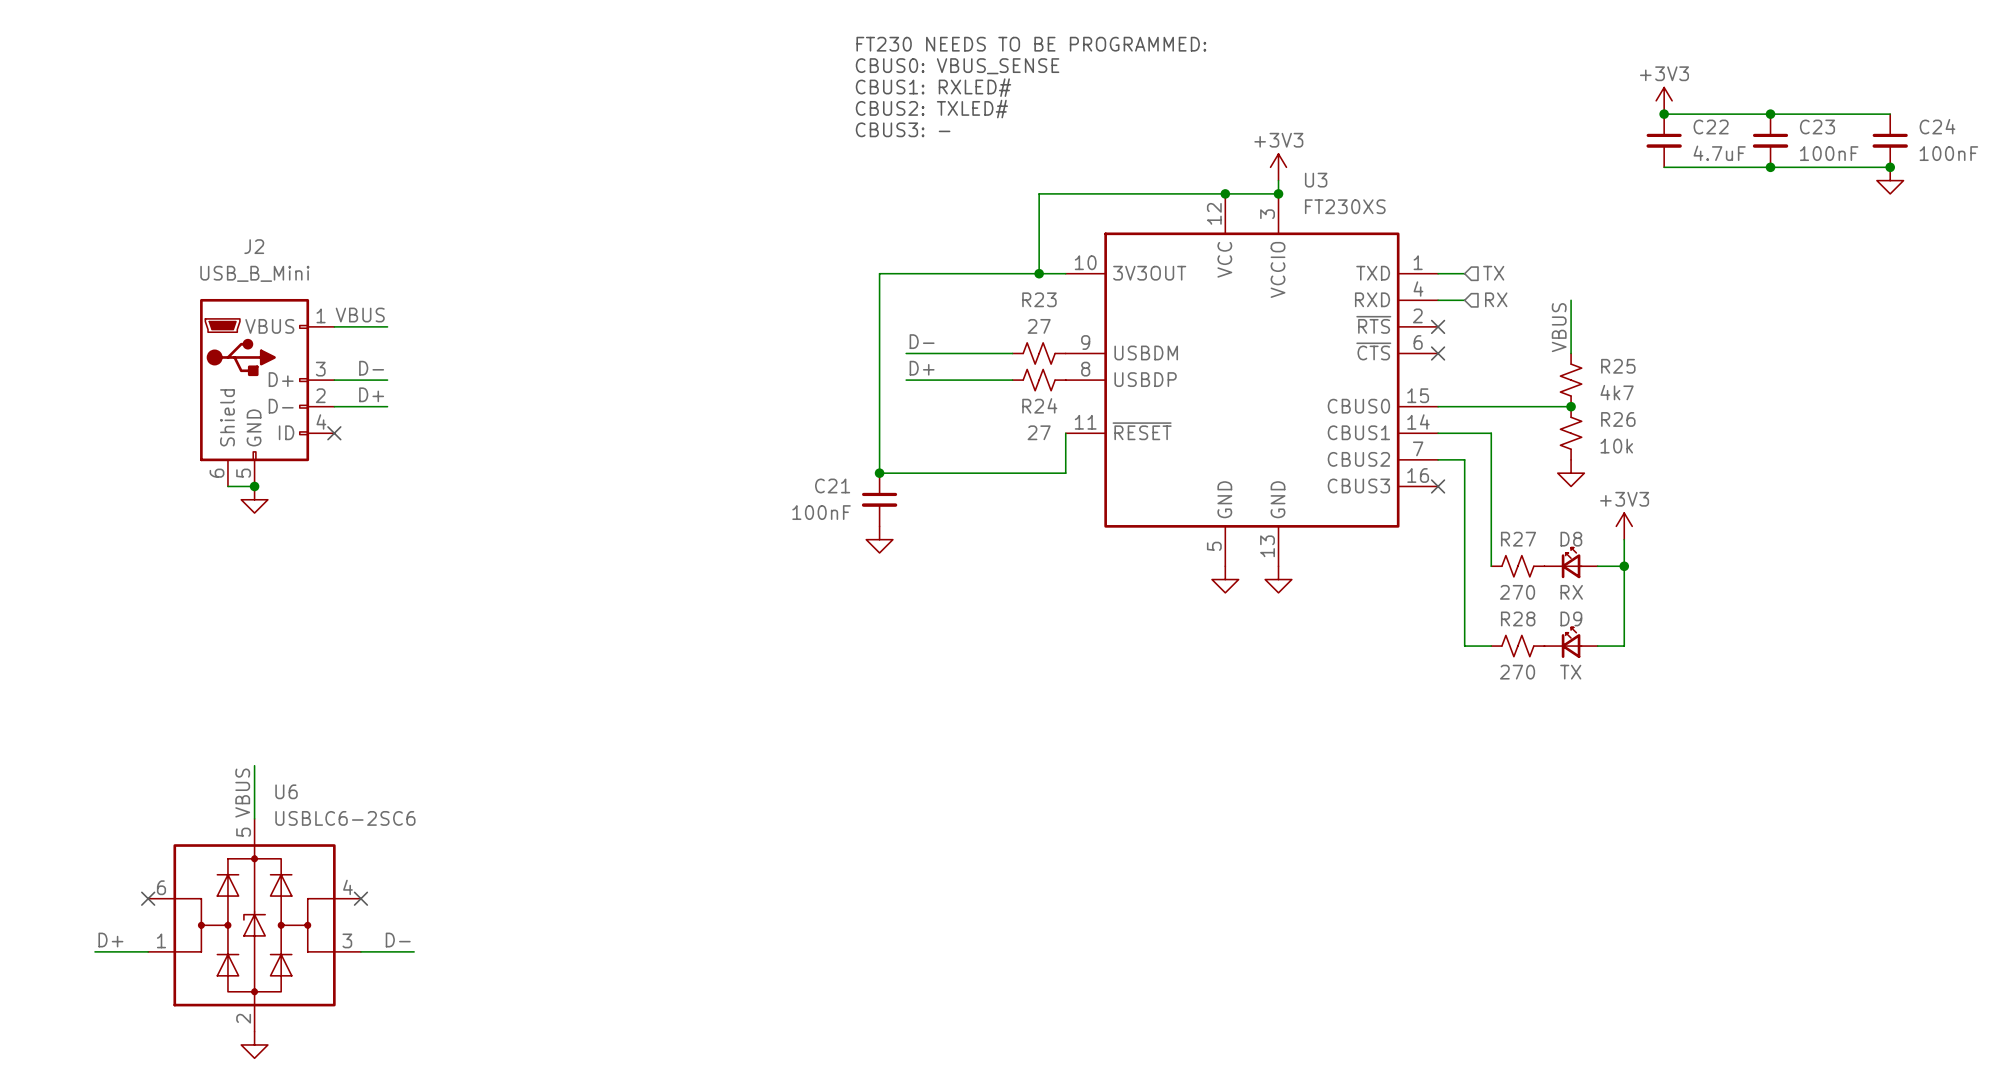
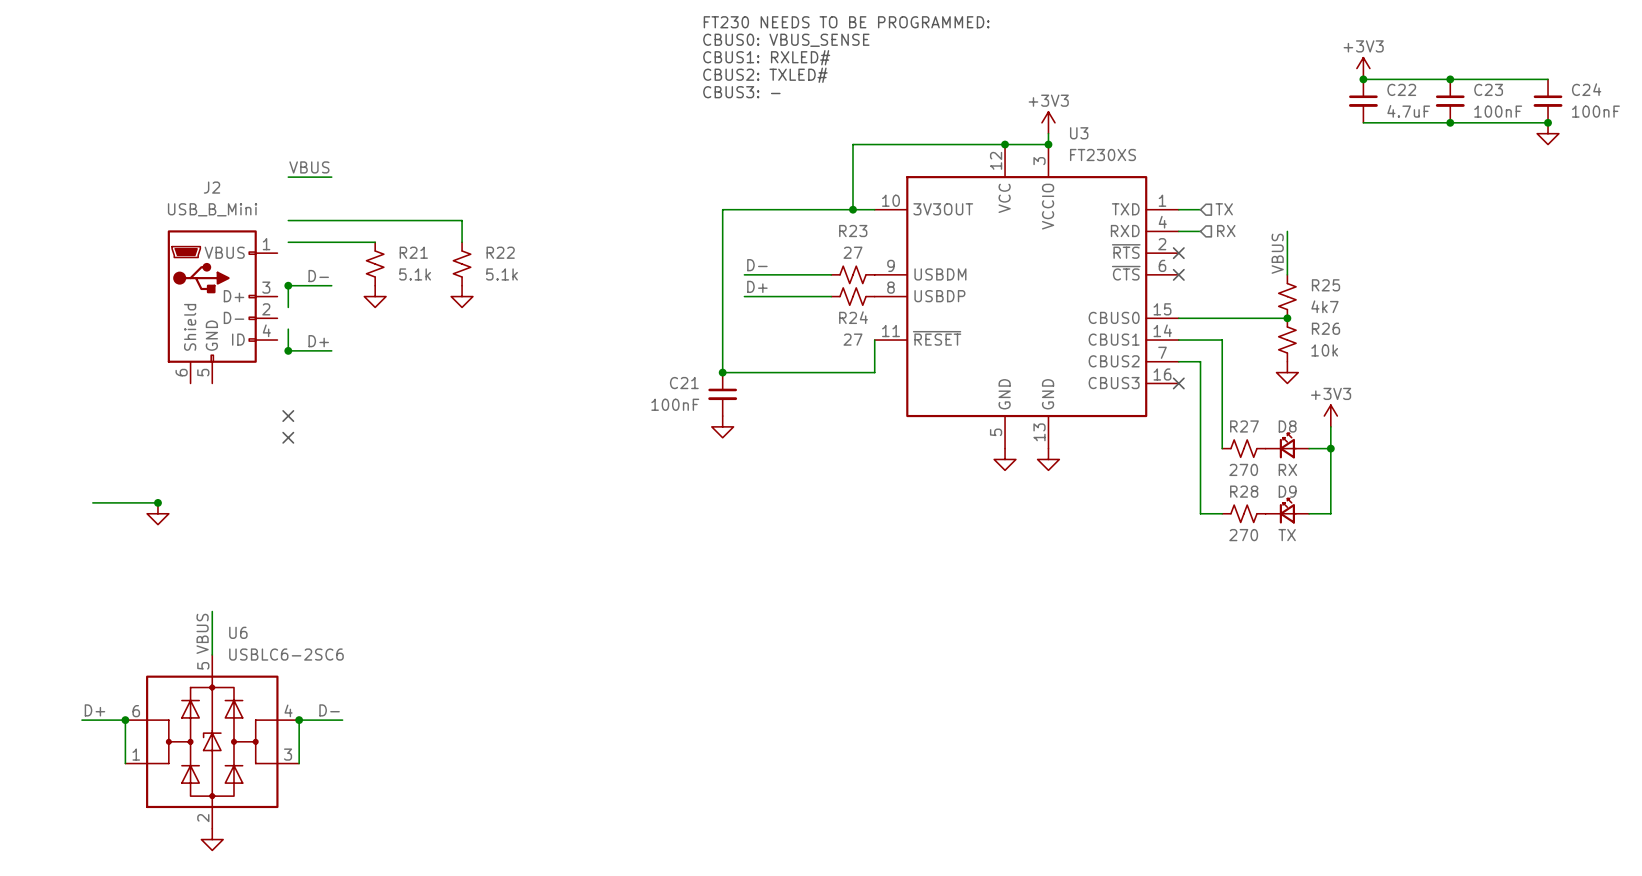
wire: none -> (288, 220) (462, 220) (462, 242)
wire: none -> (288, 242) (375, 242)
label position: VBUS (360, 315) -> VBUS (309, 167)
wire: (334, 326) (387, 326) -> (288, 177) (331, 177)
R21: none -> 5.1k (375, 264)
R22: none -> 5.1k (462, 264)
junction: none -> (288, 285)
wire: none -> (331, 285) (288, 285) (288, 307)
label position: D- (371, 368) -> D- (318, 276)
wire: (334, 380) (387, 380) -> none
power symbol: none -> (375, 296)
power symbol: none -> (462, 296)
label position: D+ (371, 394) -> D+ (318, 341)
wire: (334, 406) (387, 406) -> none
wire: none -> (288, 329) (288, 350) (331, 350)
no-connect mark: (334, 433) -> none
junction: none -> (288, 350)
wire: (227, 486) (254, 486) -> none
junction: (254, 486) -> none
power symbol: (254, 499) -> none
no-connect mark: none -> (288, 416)
no-connect mark: none -> (288, 437)
wire: none -> (92, 502) (157, 502)
junction: none -> (157, 502)
power symbol: none -> (157, 513)
junction: none -> (125, 720)
no-connect mark: (148, 898) -> none
junction: none -> (299, 720)
no-connect mark: (360, 898) -> none
label position: D+ (110, 940) -> D+ (94, 710)
label position: D- (398, 940) -> D- (329, 710)
wire: (94, 951) (148, 951) -> (81, 720) (125, 720) (125, 763)
wire: (360, 951) (414, 951) -> (299, 763) (299, 720) (342, 720)

